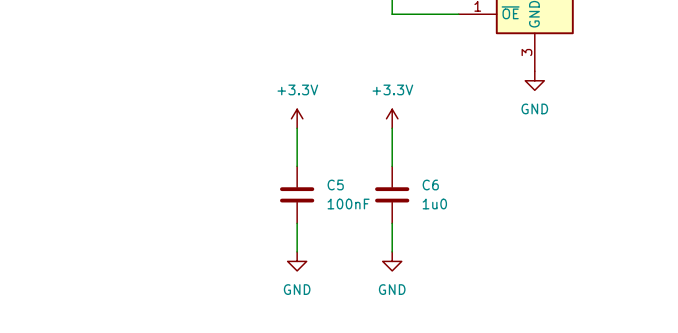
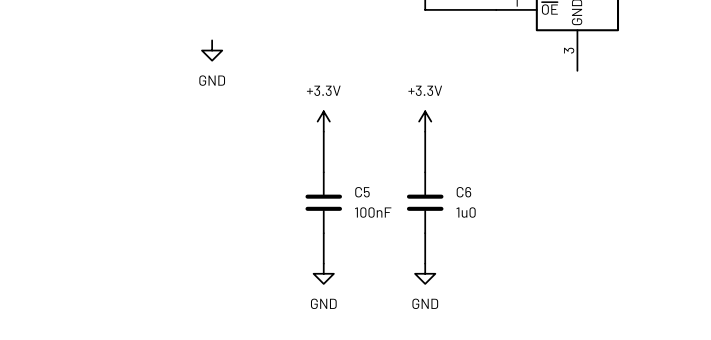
power symbol: none -> GND (212, 50)
power symbol: GND (534, 80) -> none

